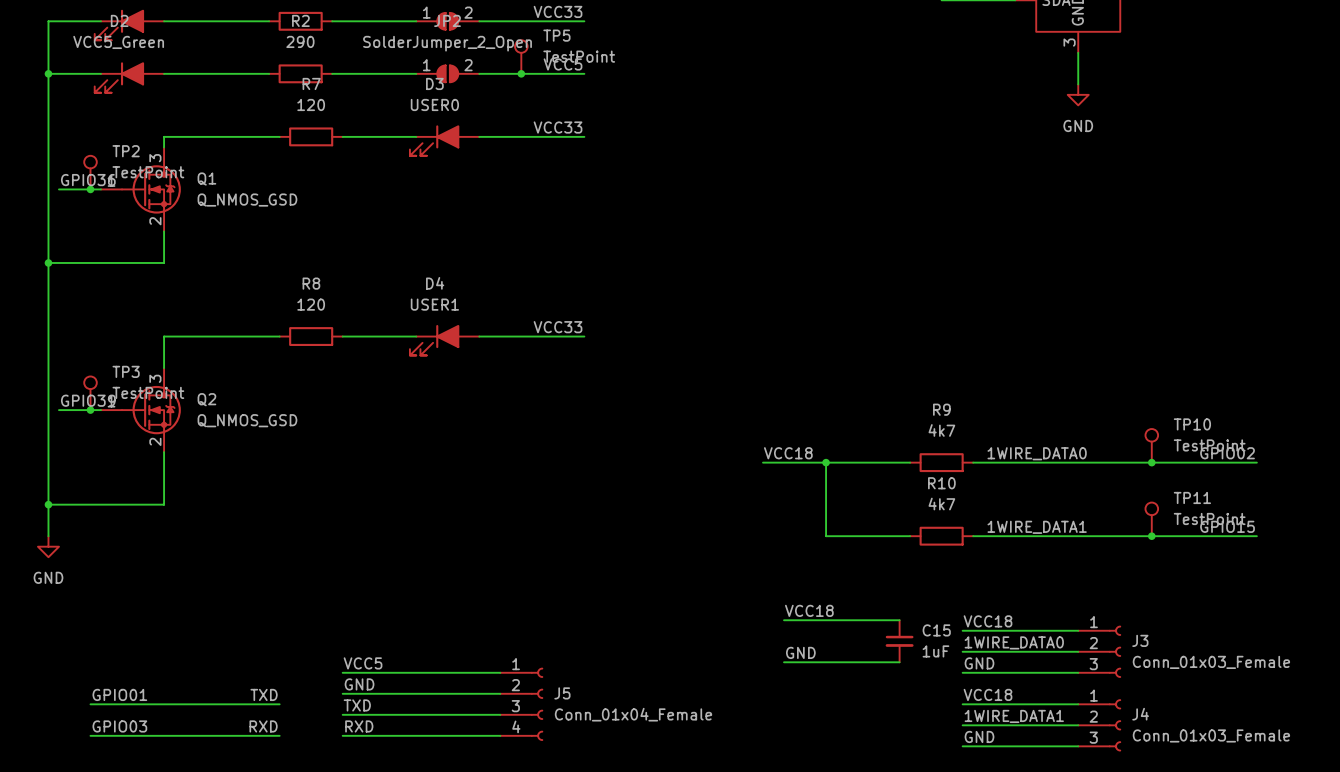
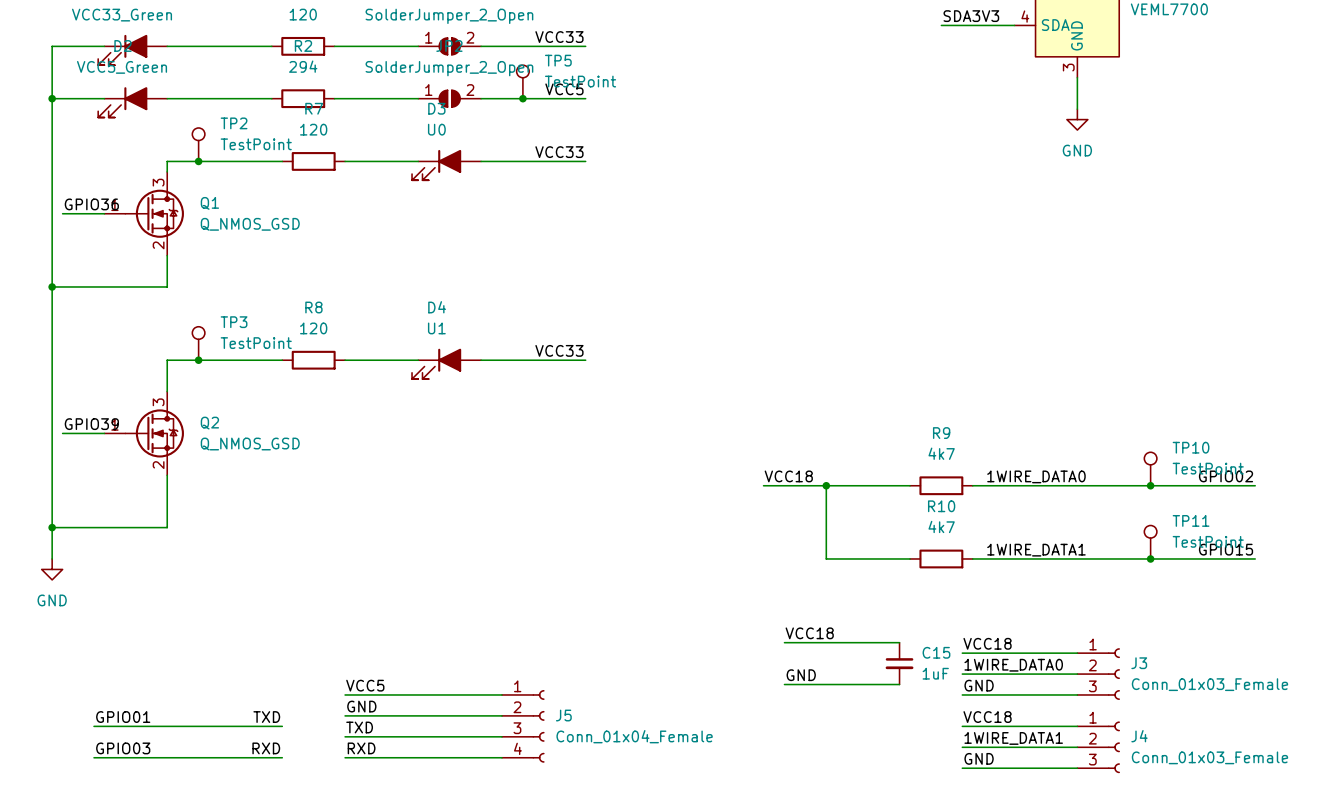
R2 value: 290 (300, 41) -> 294 (303, 66)
D3 value: USER0 (434, 104) -> U0 (436, 129)
junction: none -> (198, 161)
TP2 position: (90, 172) -> (198, 144)
junction: (90, 189) -> none
D4 value: USER1 (434, 304) -> U1 (436, 328)
junction: none -> (198, 360)
TP3 position: (90, 393) -> (198, 343)
junction: (90, 410) -> none

